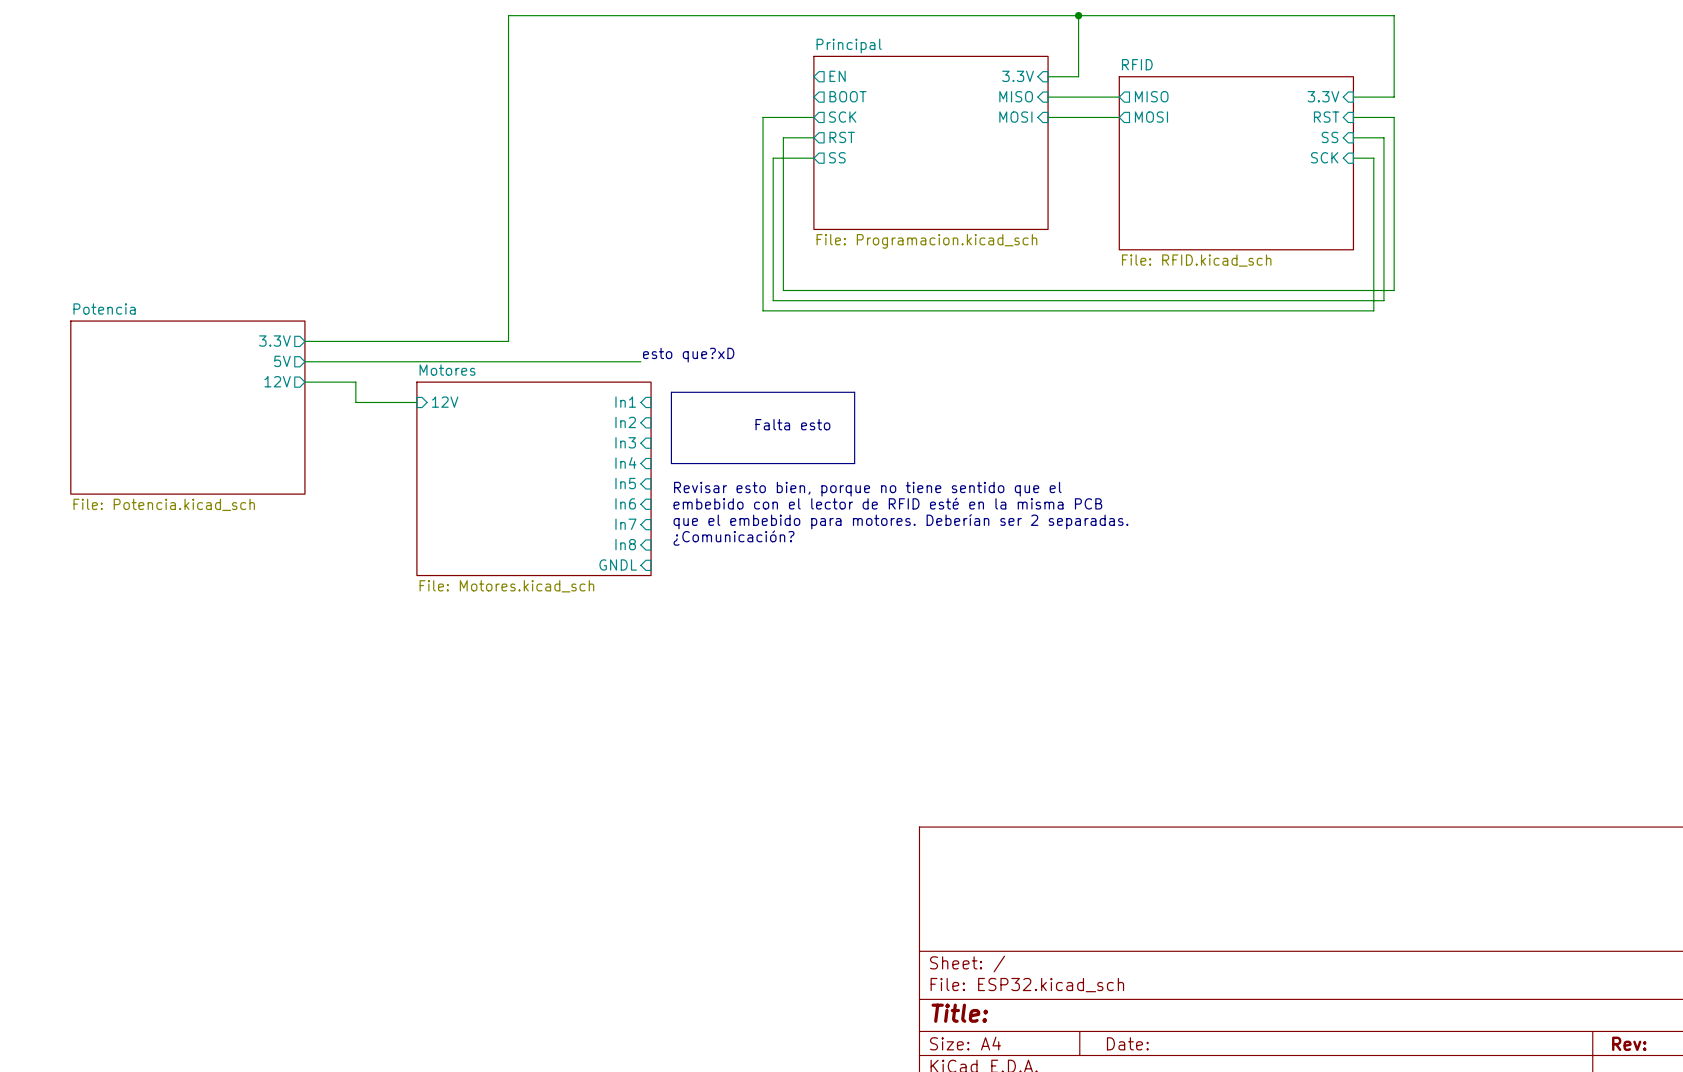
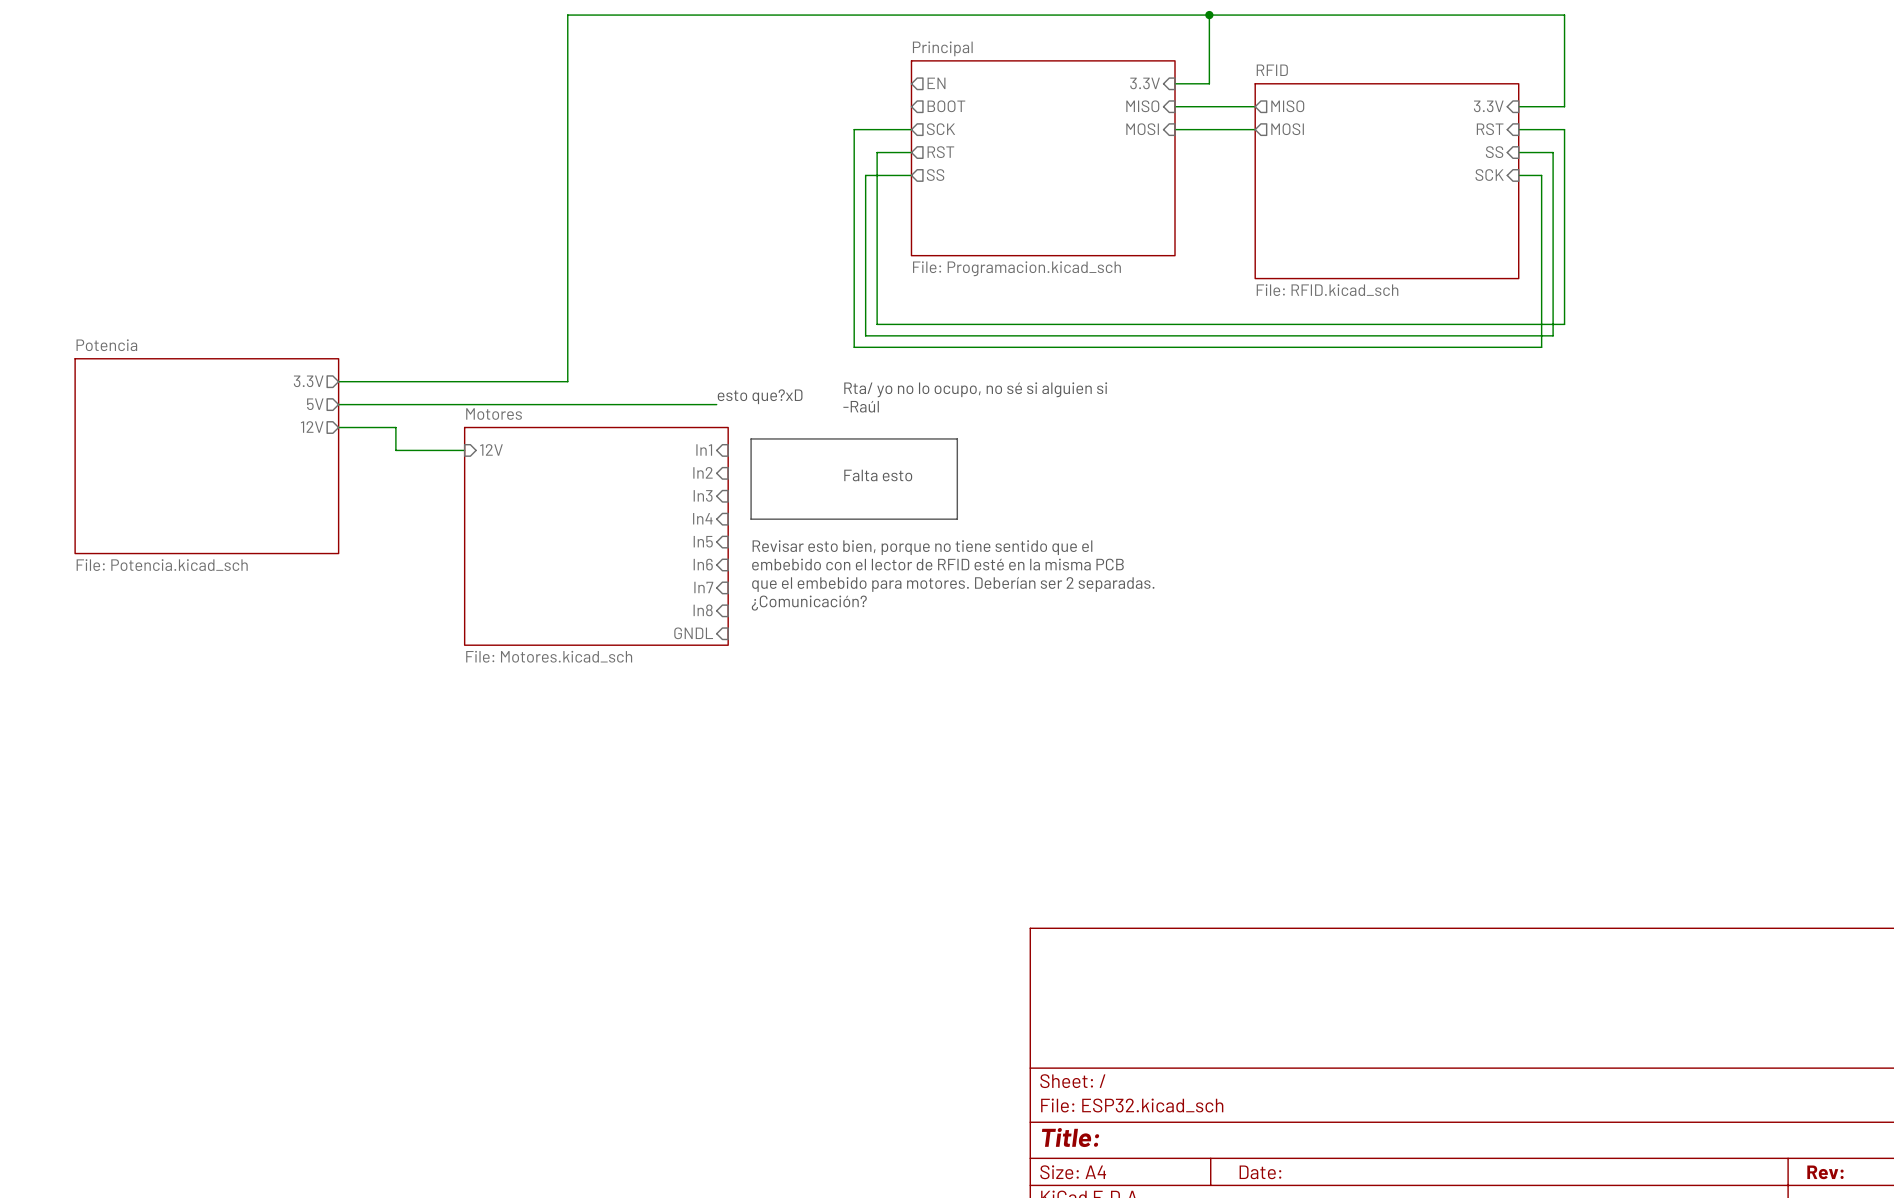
text: none -> Rta/ yo no lo ocupo, no sé si alguien si (975, 389)
text: none -> -Raúl (861, 406)

